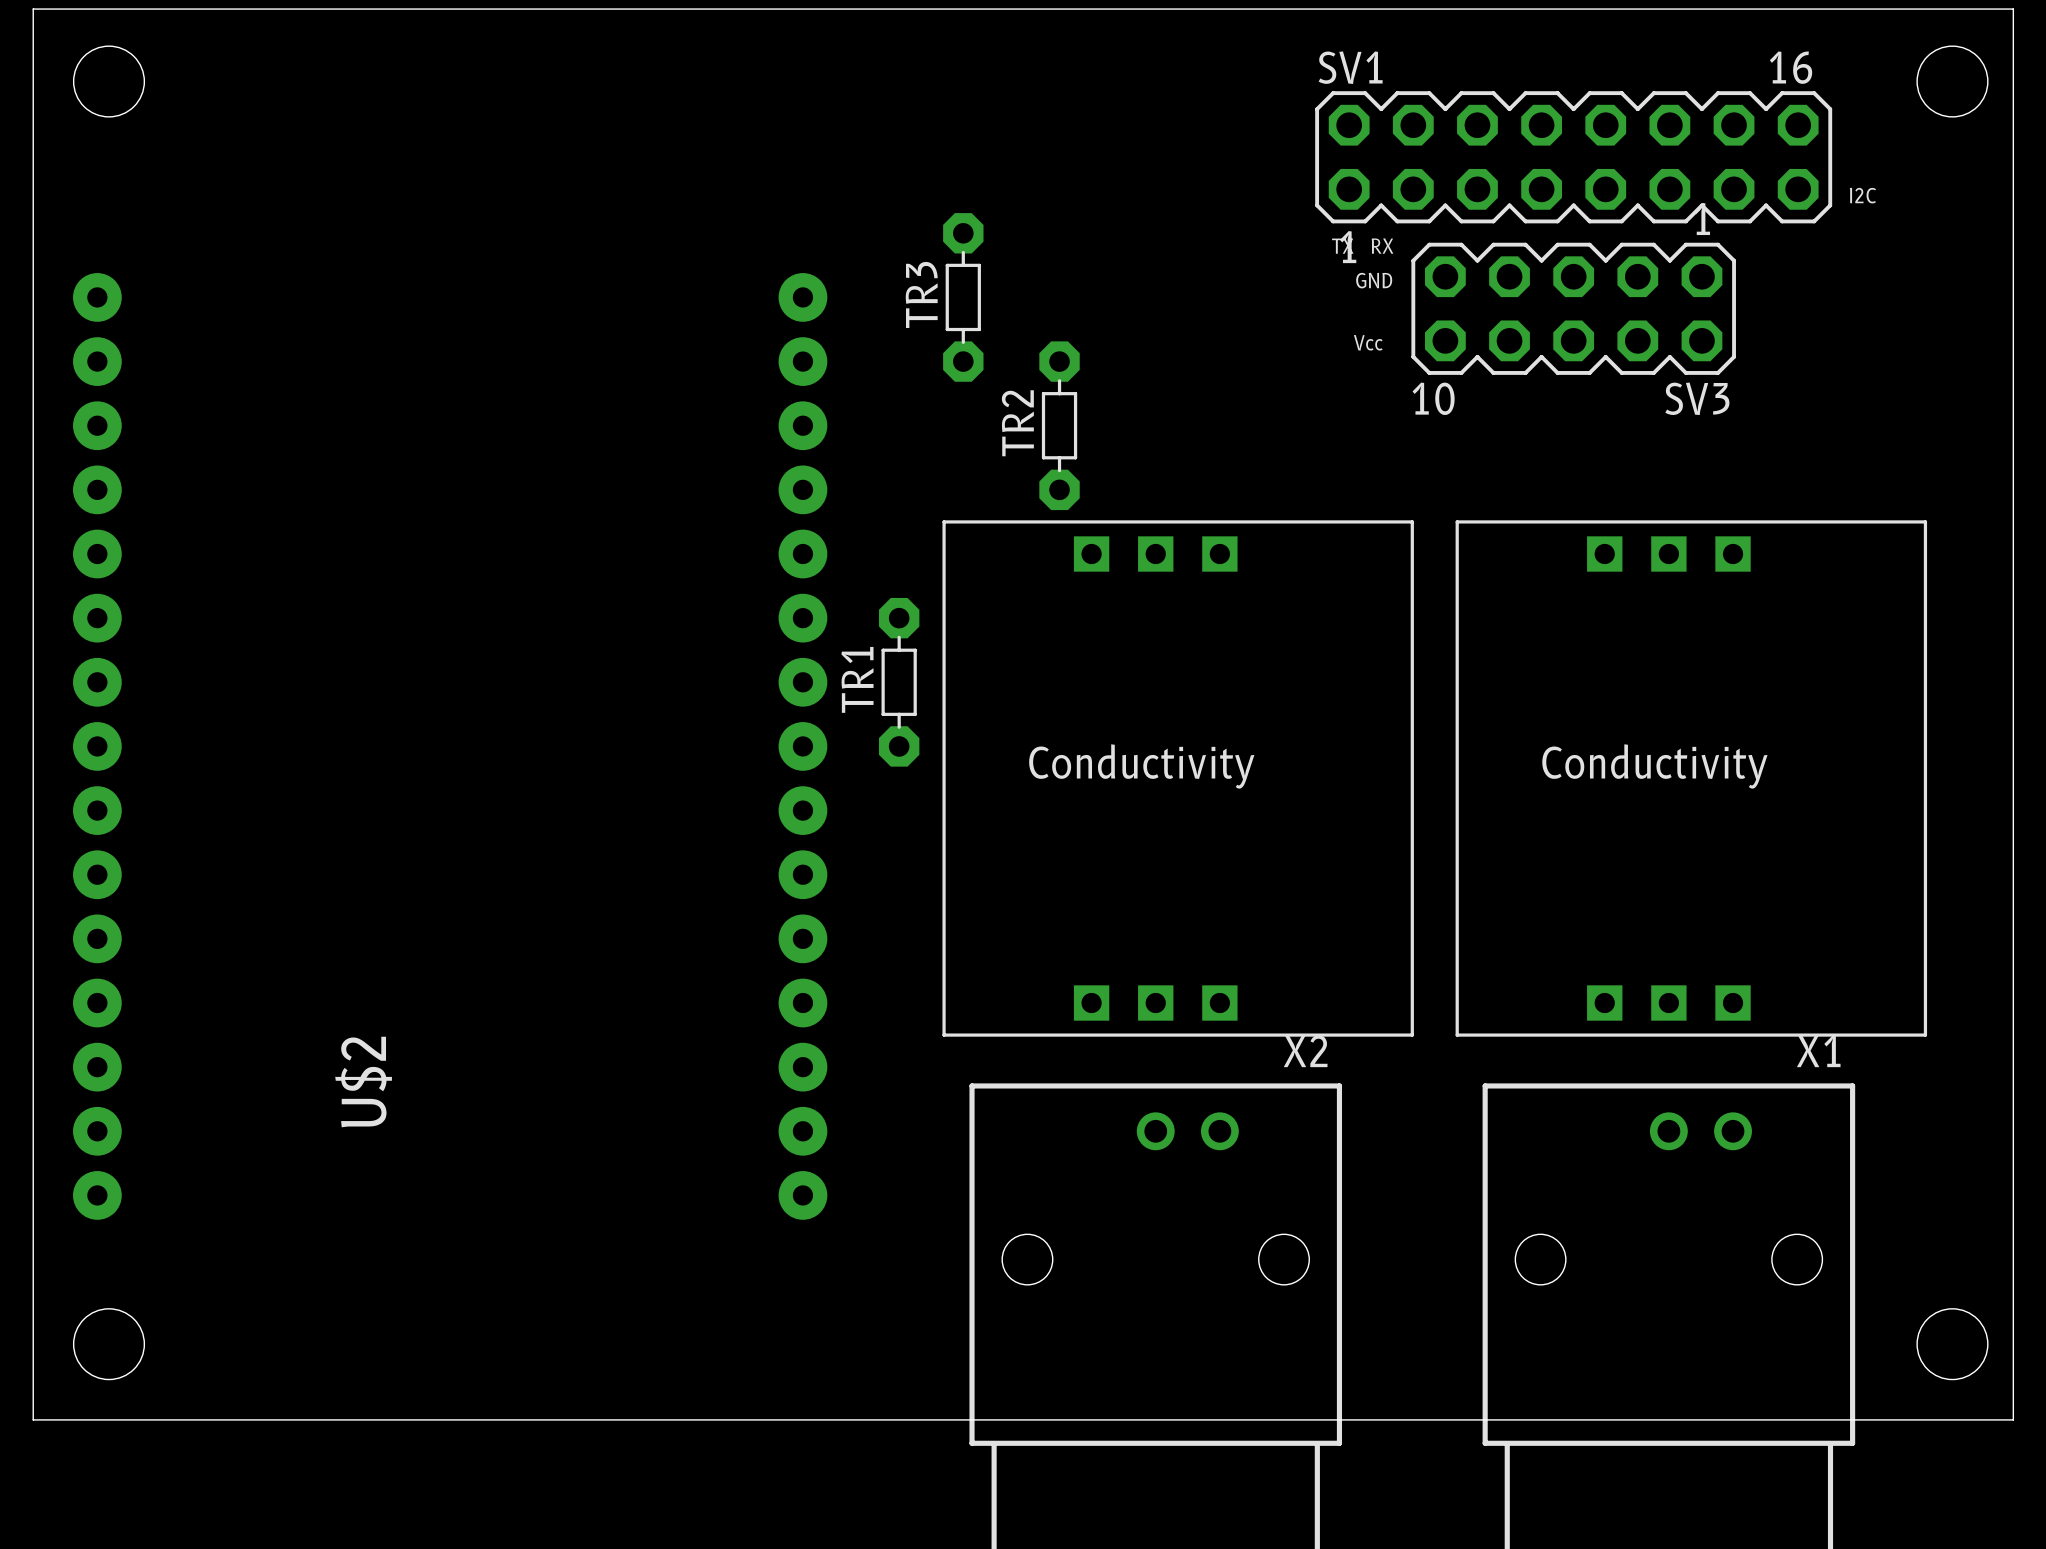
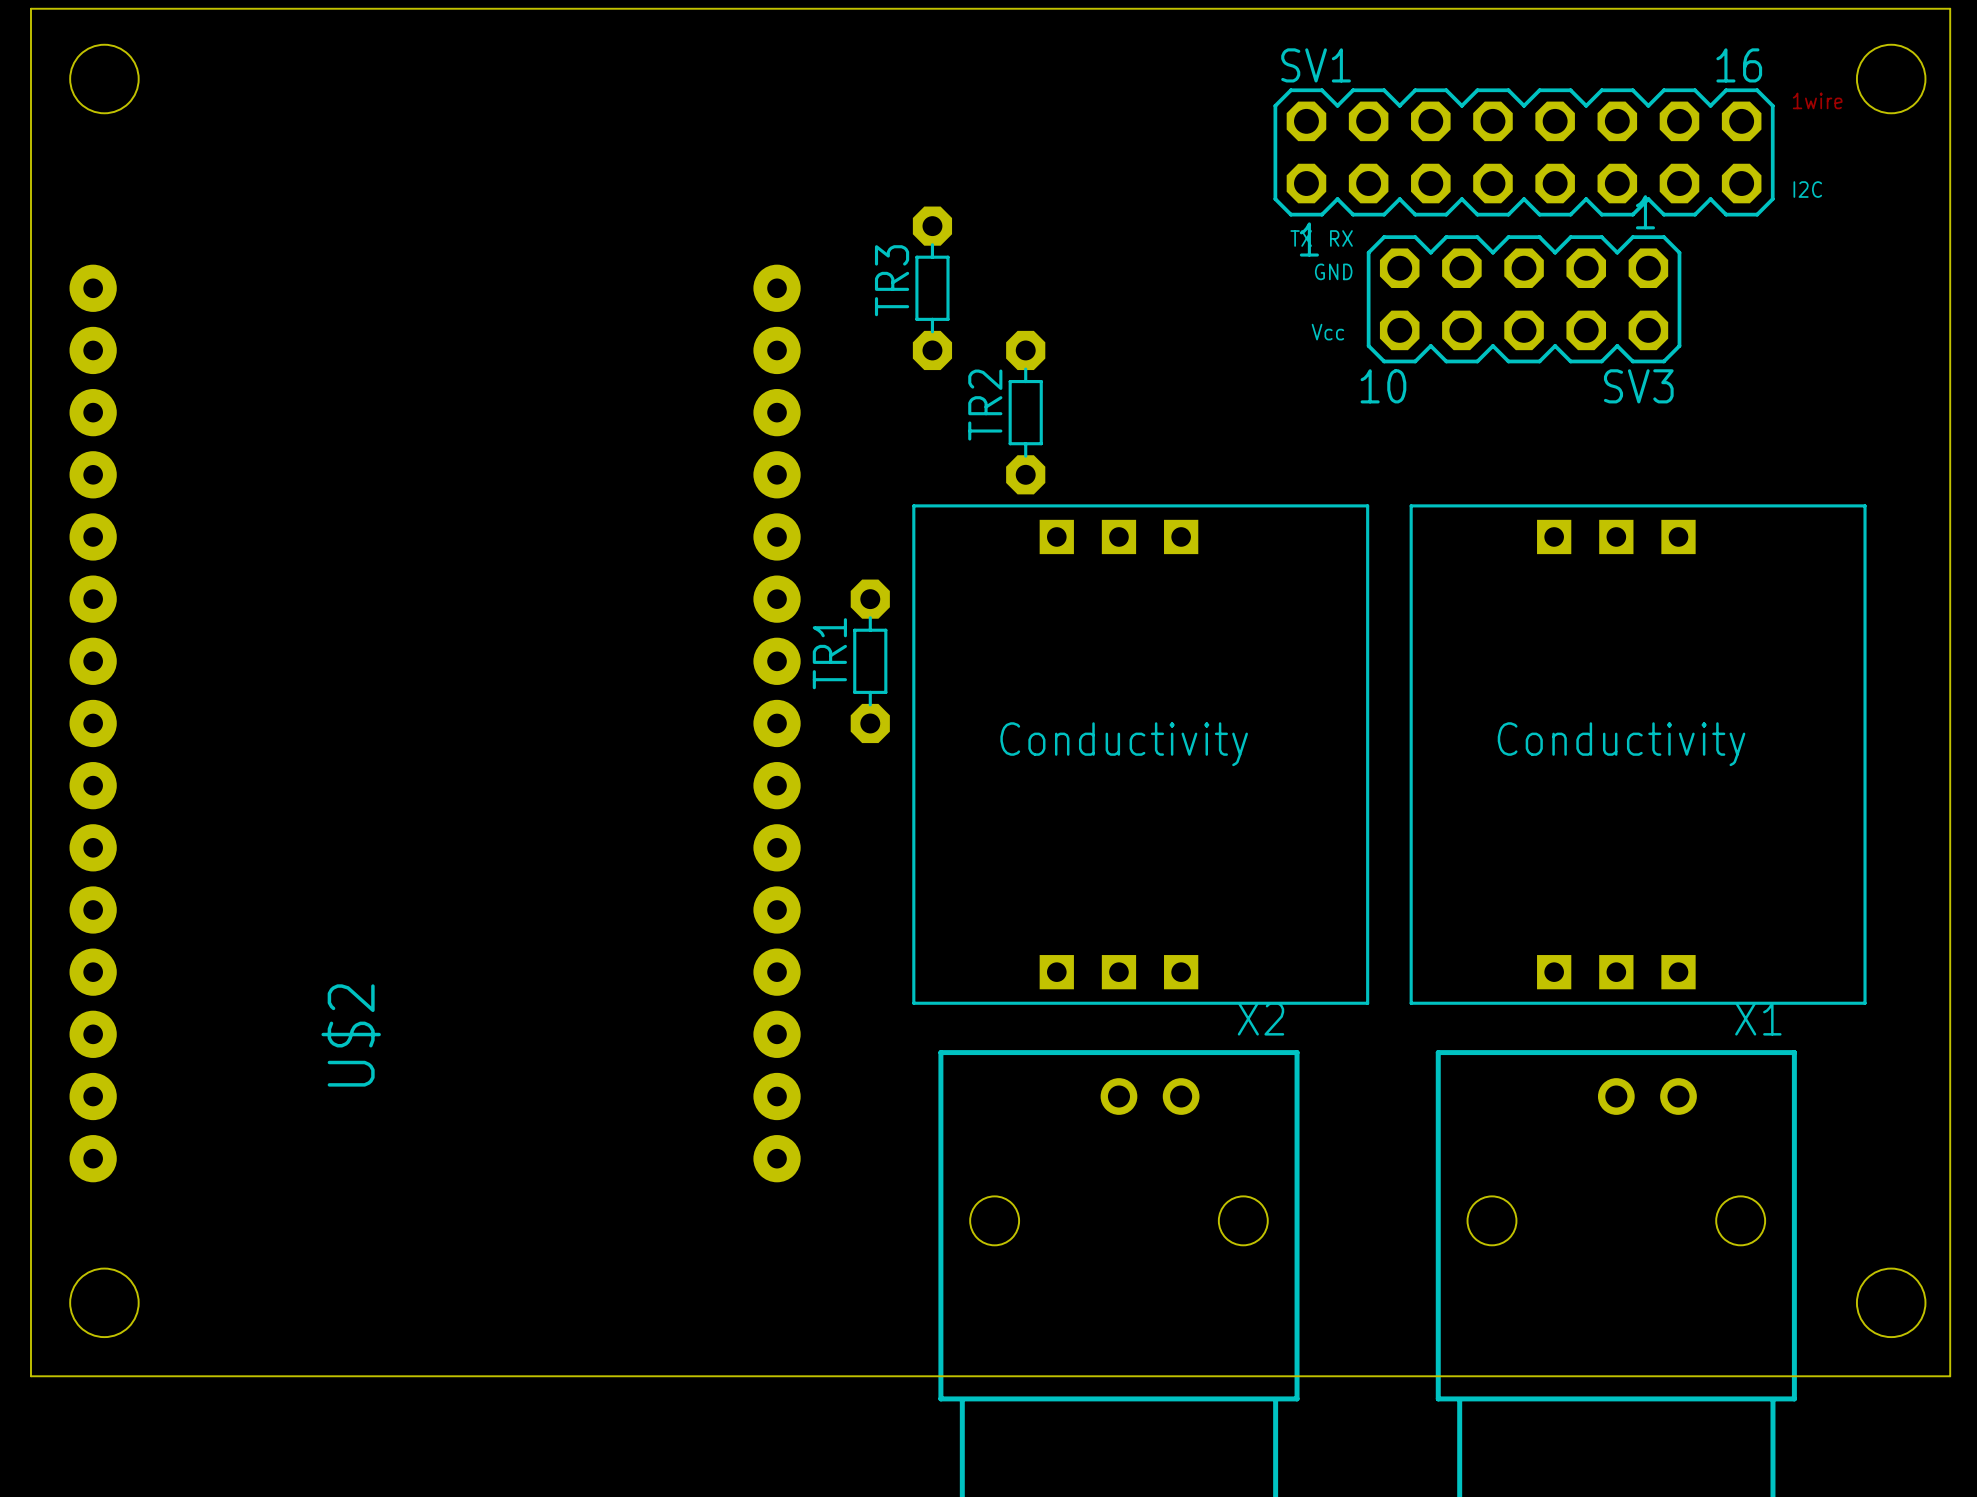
text: none -> 1wire (1817, 100)

